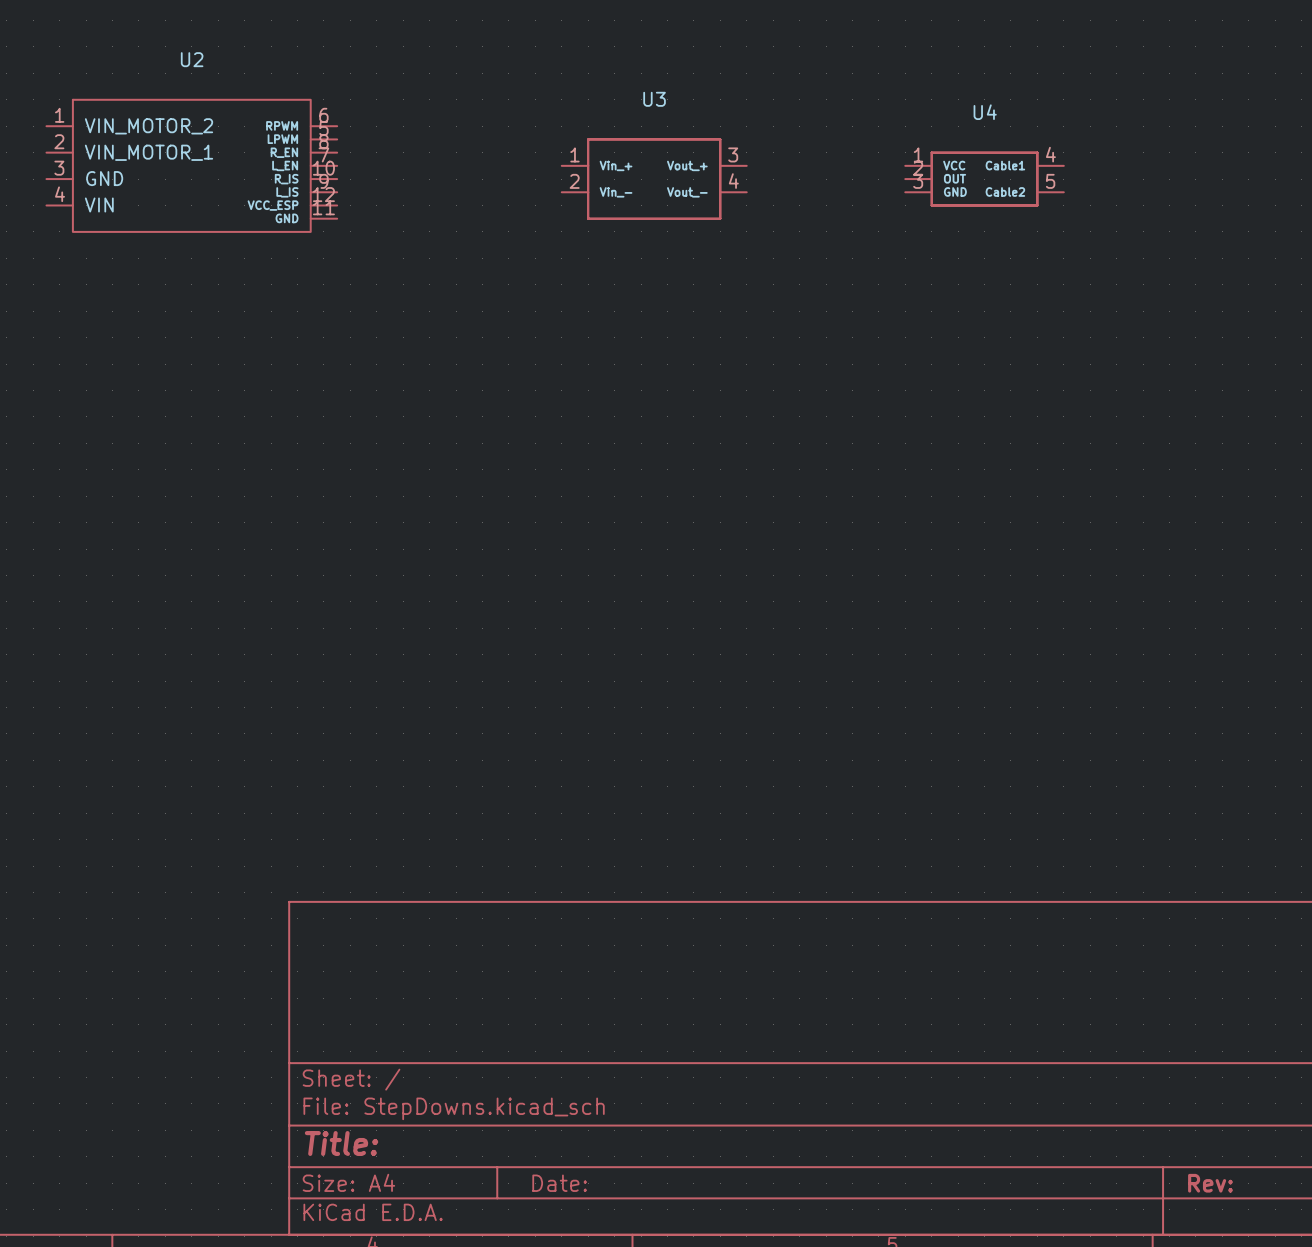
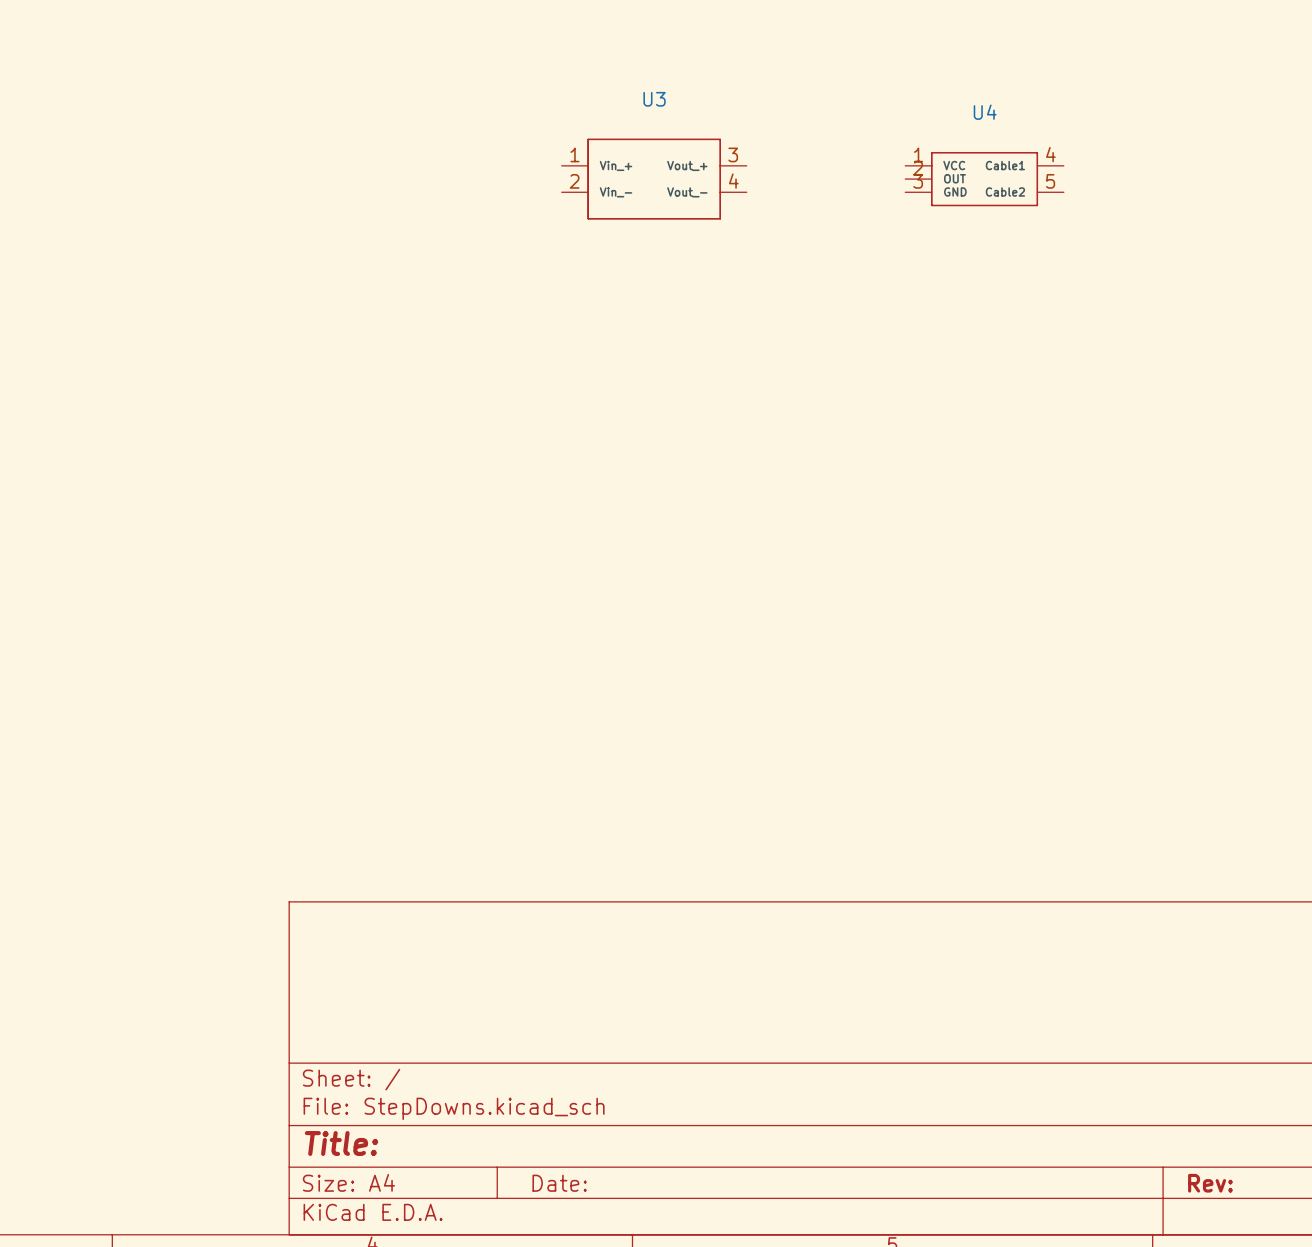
U2: (191, 165) -> none

